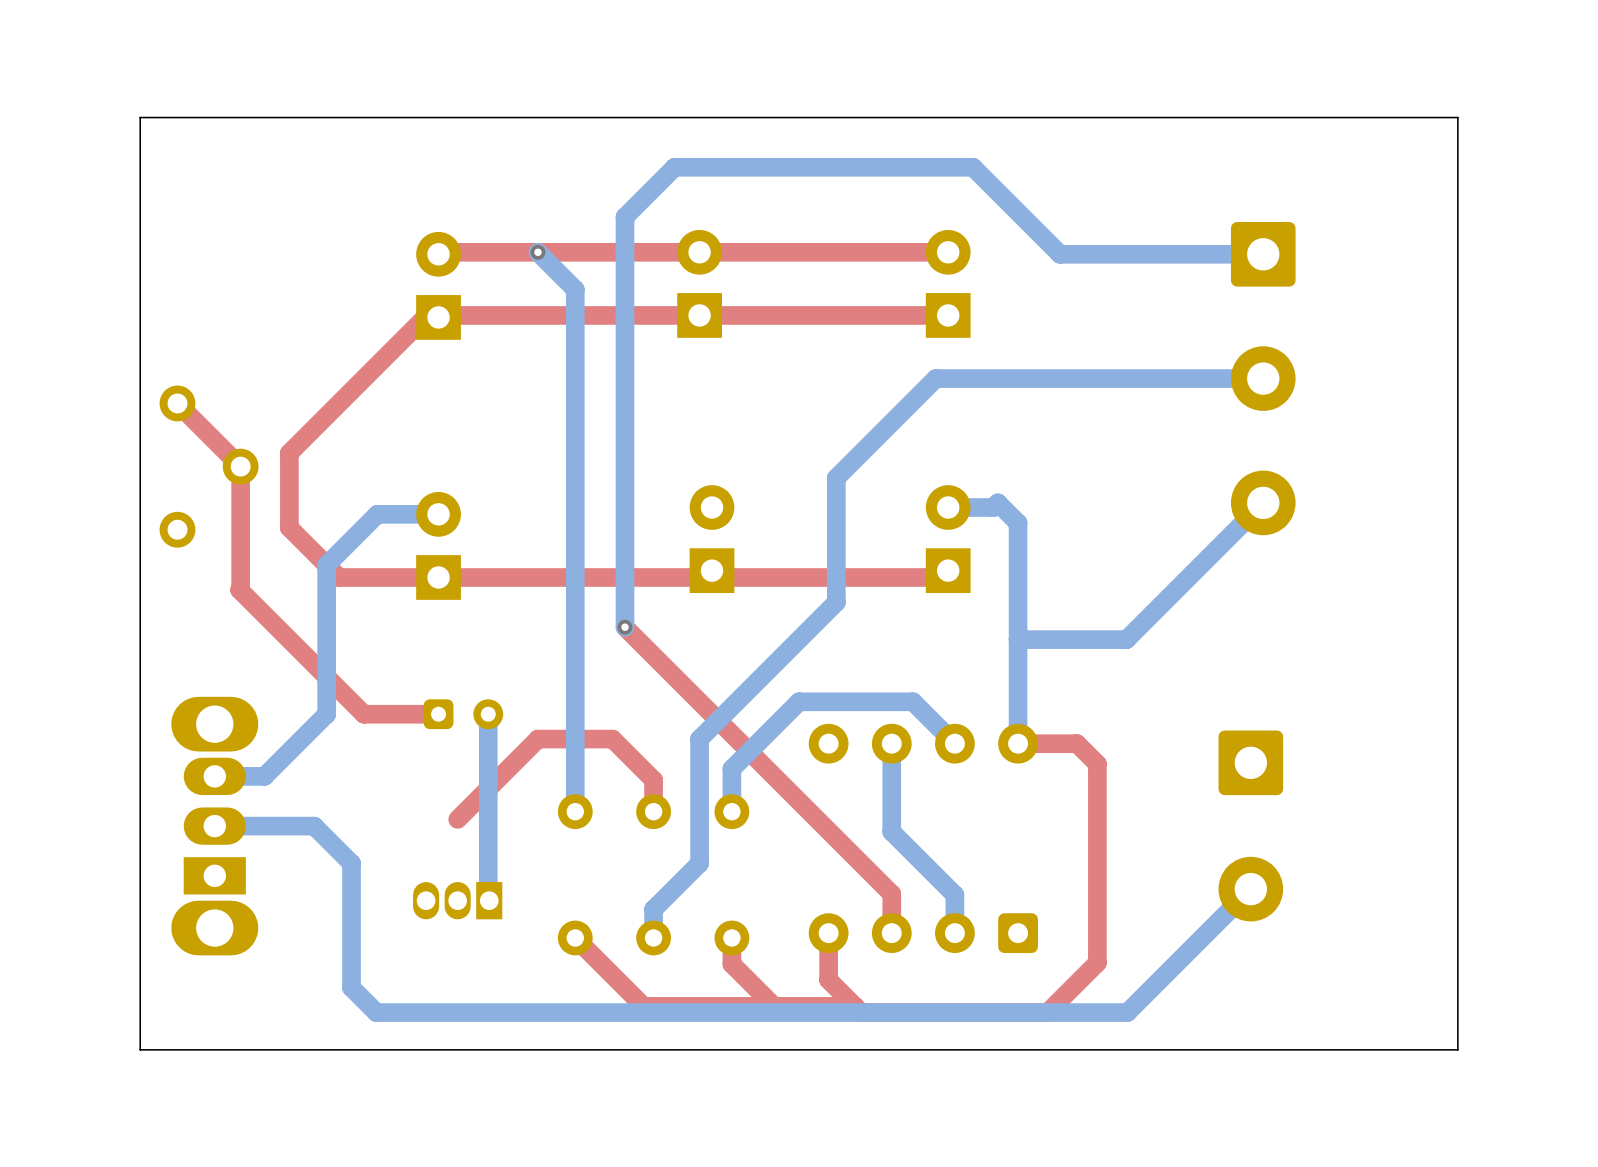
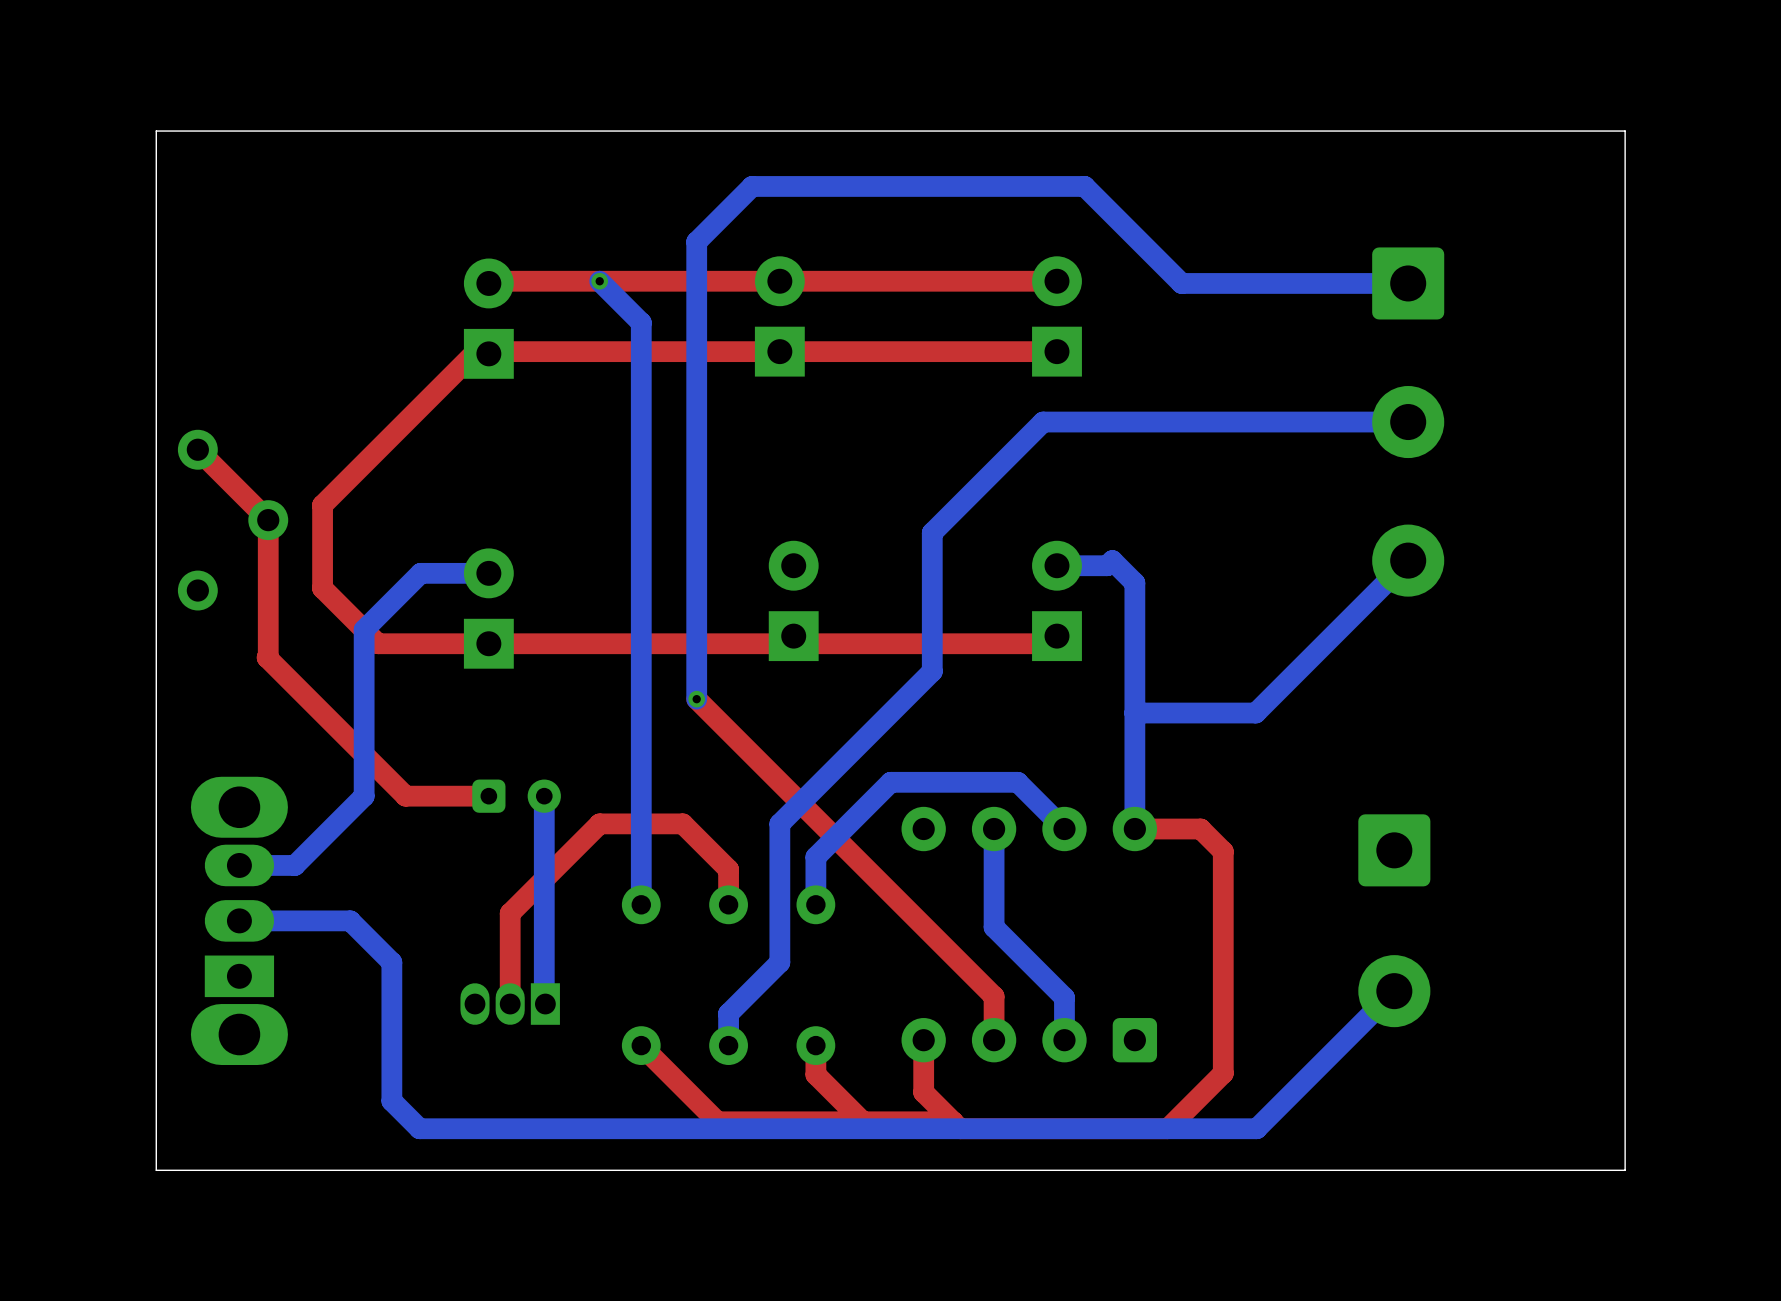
top track: none -> (510, 913) (510, 1004)

